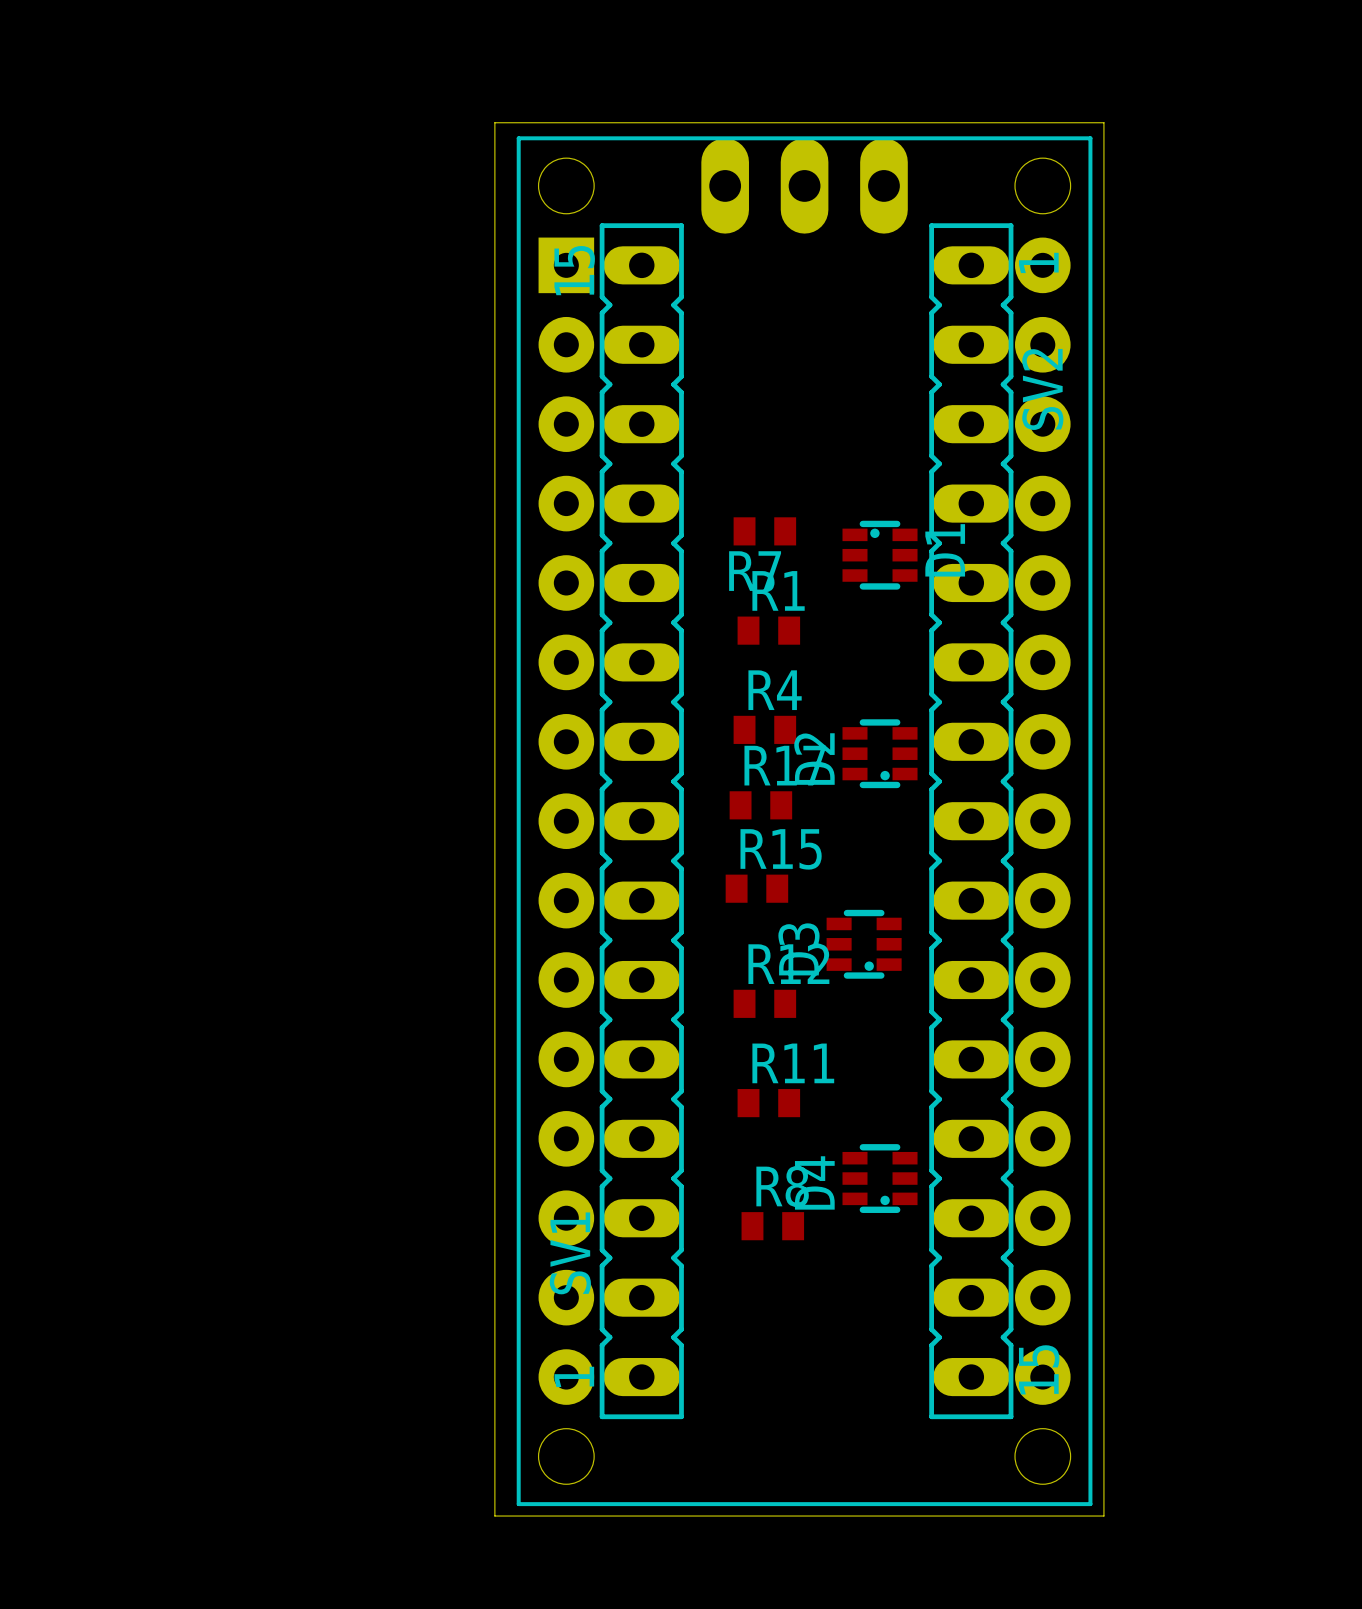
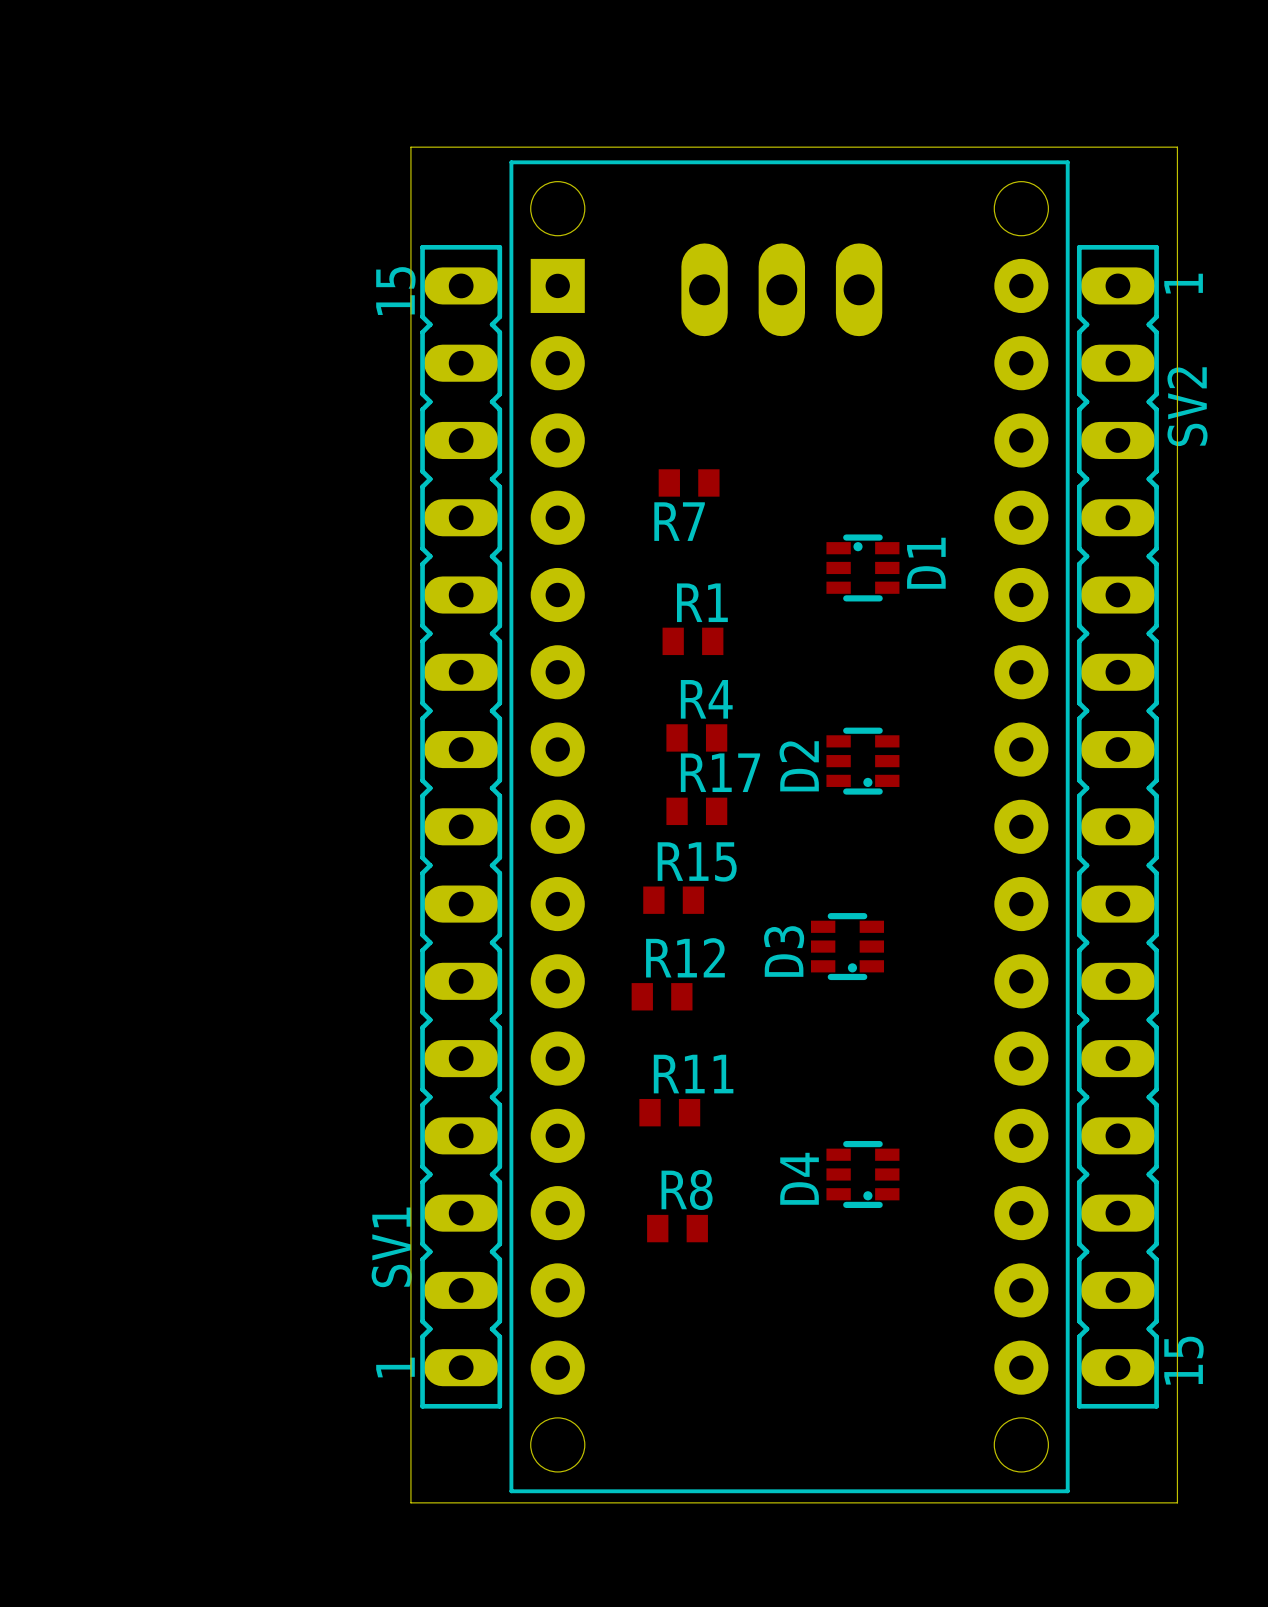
board edge: (494, 122) (494, 1516) -> (488, 147) (410, 147) (410, 1502) (488, 1502)
board edge: (1103, 122) (1103, 1516) -> (1080, 147) (1177, 147) (1177, 1502) (1080, 1502)
part position: (804, 185) -> (781, 289)
R7 position: (764, 531) -> (689, 482)
R1 position: (768, 630) -> (692, 641)
R4 position: (764, 729) -> (696, 737)
R17 position: (760, 805) -> (696, 811)
SV1 position: (641, 821) -> (461, 826)
SV2 position: (971, 821) -> (1117, 826)
R15 position: (756, 888) -> (673, 900)
R12 position: (764, 1003) -> (662, 996)
R11 position: (768, 1103) -> (669, 1112)
R8 position: (772, 1226) -> (677, 1228)

